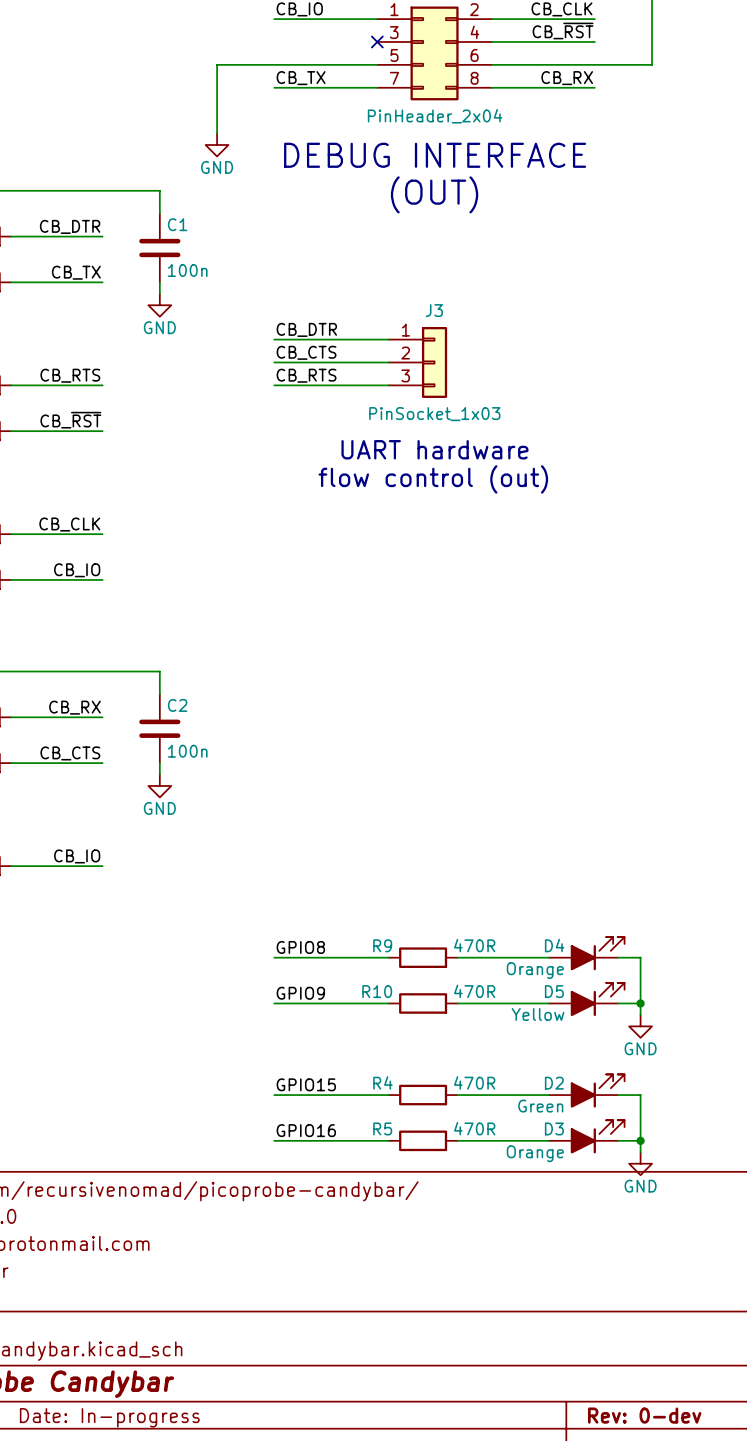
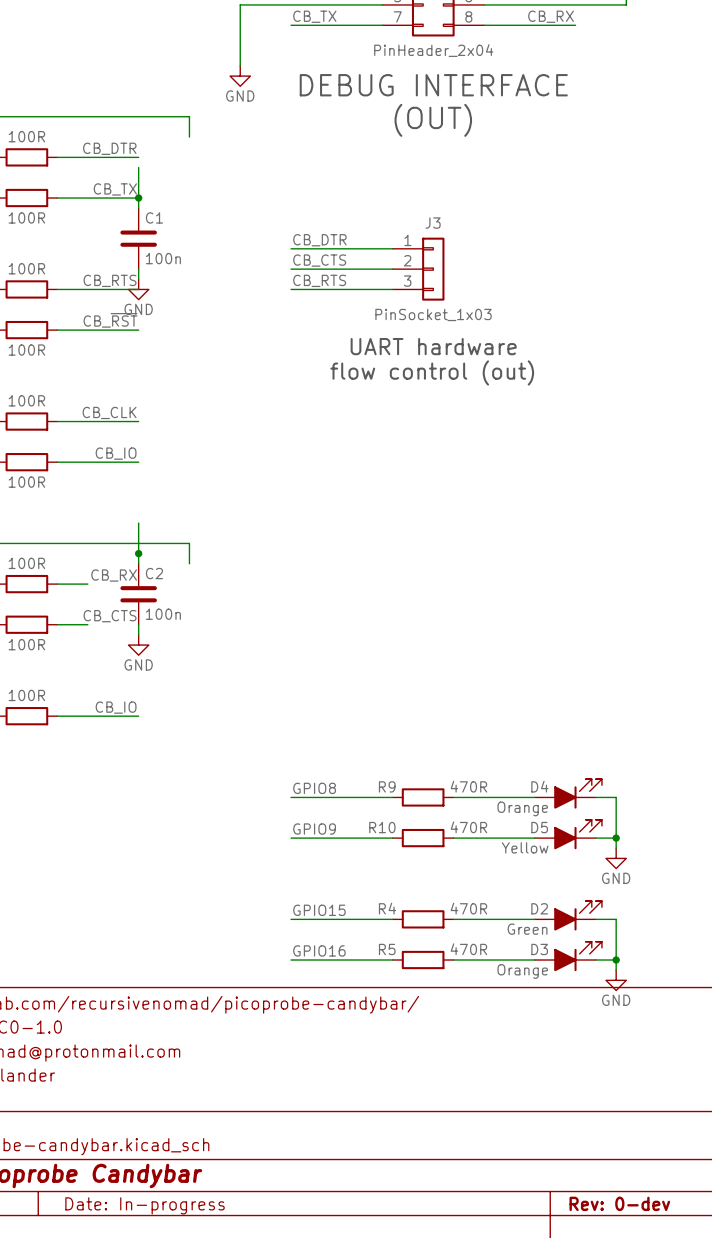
wire: none -> (138, 167) (138, 208)
C1 position: (159, 248) -> (138, 238)
junction: none -> (138, 198)
wire: (159, 282) (159, 293) -> (138, 269) (138, 279)
power symbol position: GND (159, 305) -> GND (138, 289)
wire: none -> (138, 523) (138, 563)
junction: none -> (138, 553)
wire: (45, 717) (102, 717) -> none
C2 position: (159, 728) -> (138, 594)
wire: (45, 763) (102, 763) -> (138, 634) (138, 624)
wire: (159, 763) (159, 774) -> none
power symbol position: GND (159, 785) -> GND (138, 645)

